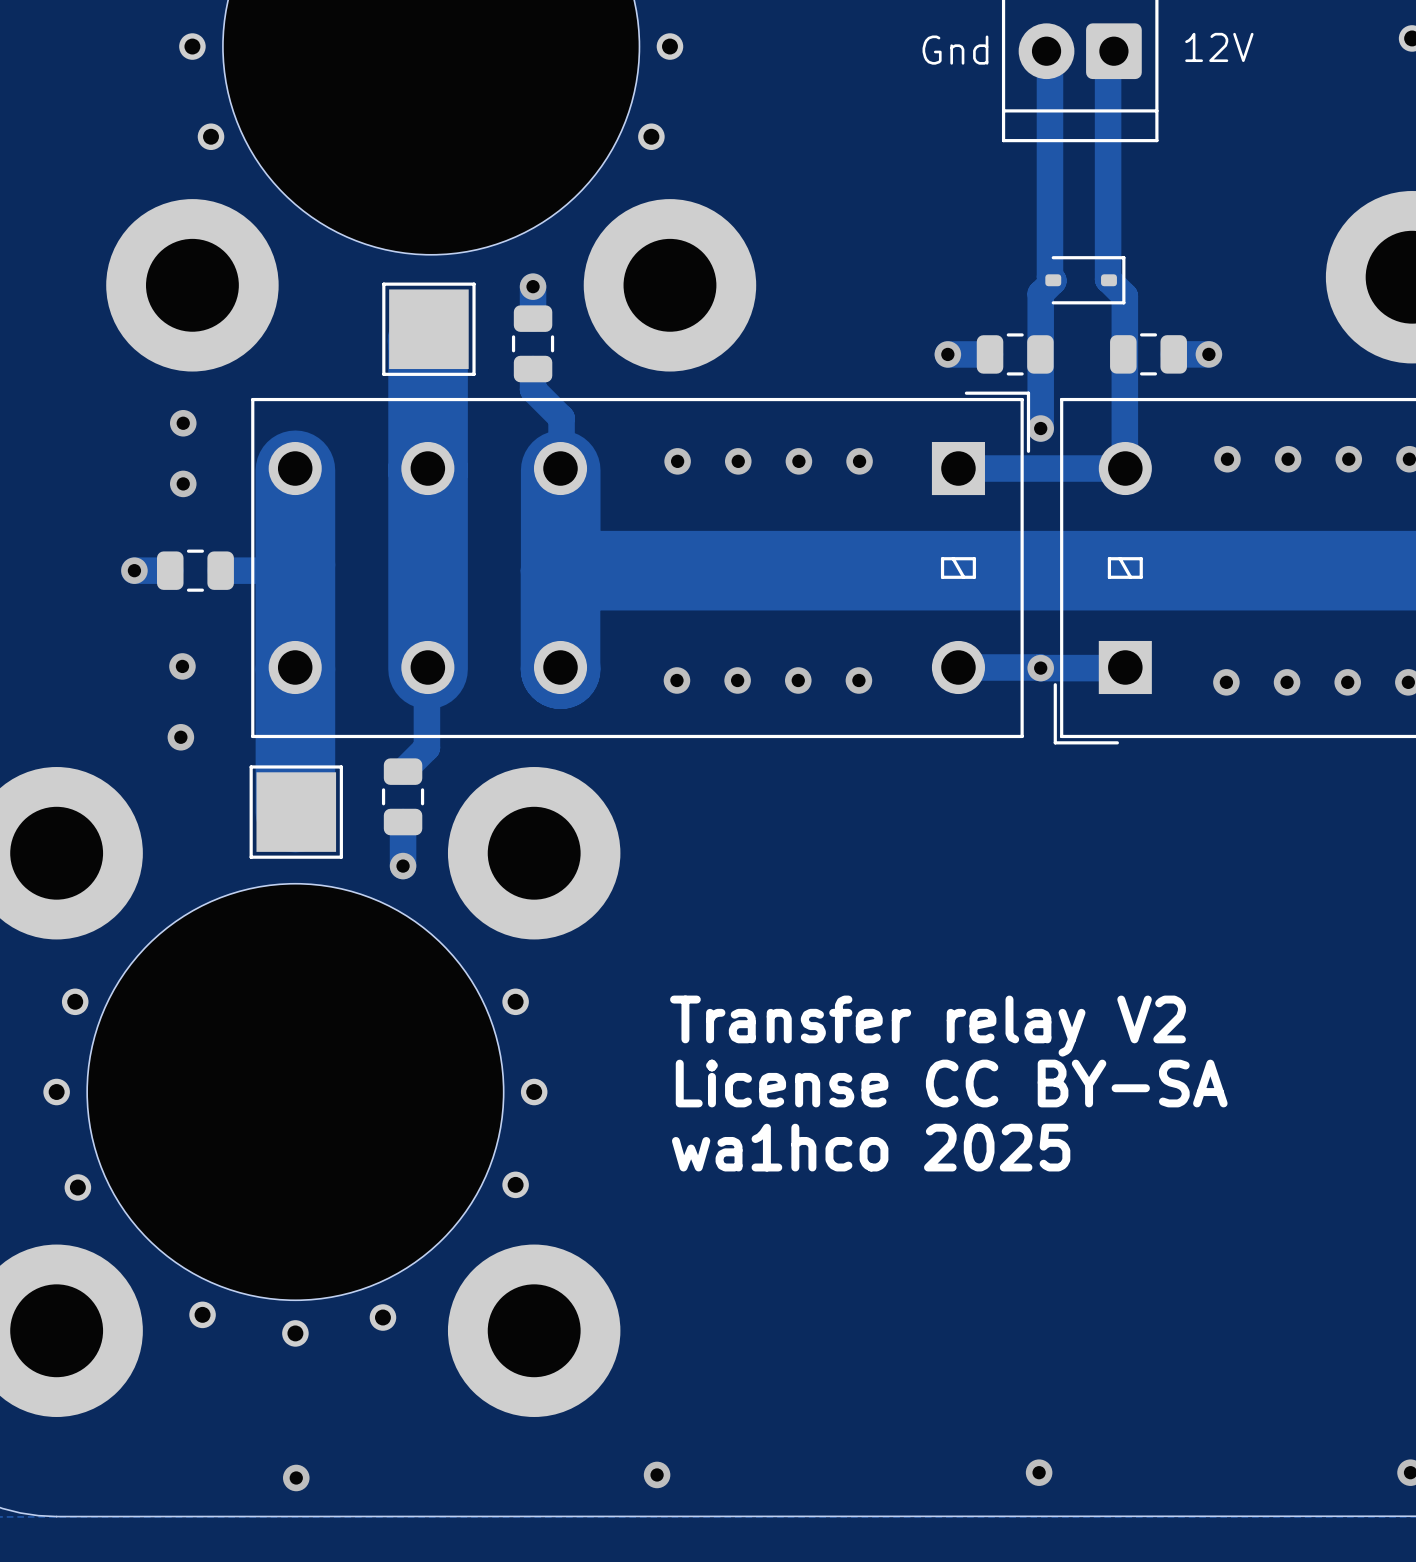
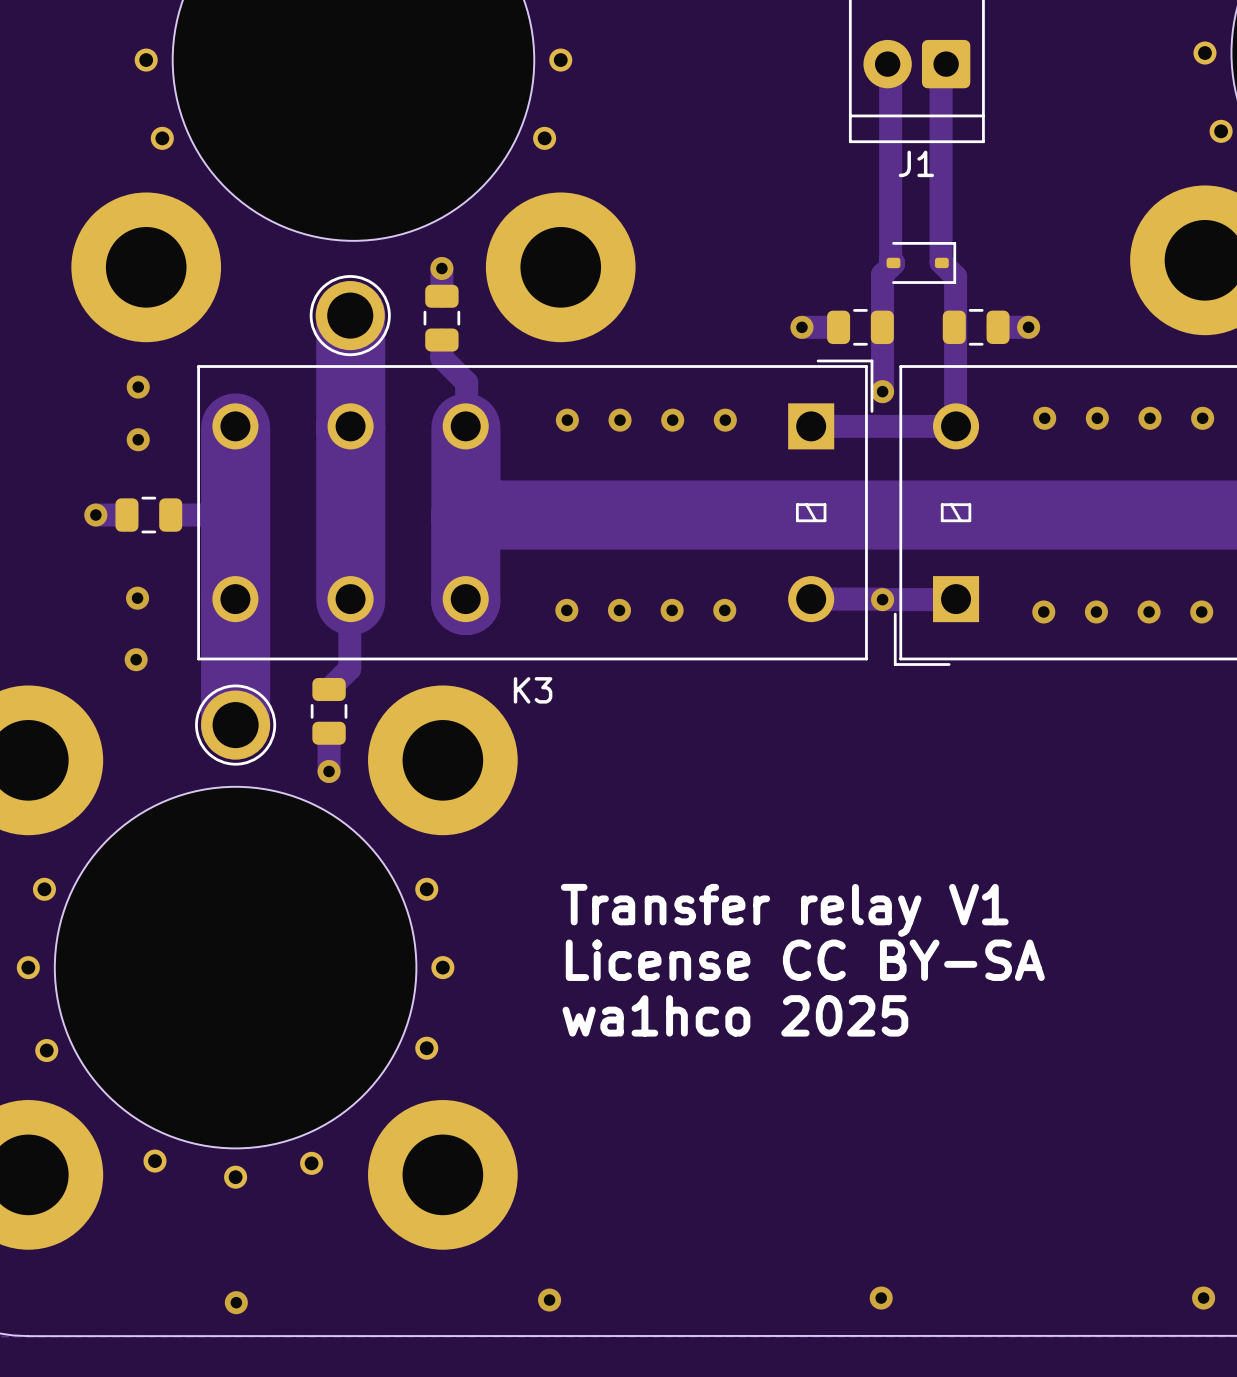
text: 12V (1219, 47) -> none
text: Gnd (955, 50) -> none
J1 name: none -> J1 (916, 163)
part footprint: [382, 282, 476, 376] -> [309, 275, 391, 357]
part footprint: [249, 765, 343, 859] -> [195, 684, 277, 766]
K3 name: none -> K3 (533, 690)
text: Transfer relay V2 (927, 1026) -> Transfer relay V1 (784, 910)

